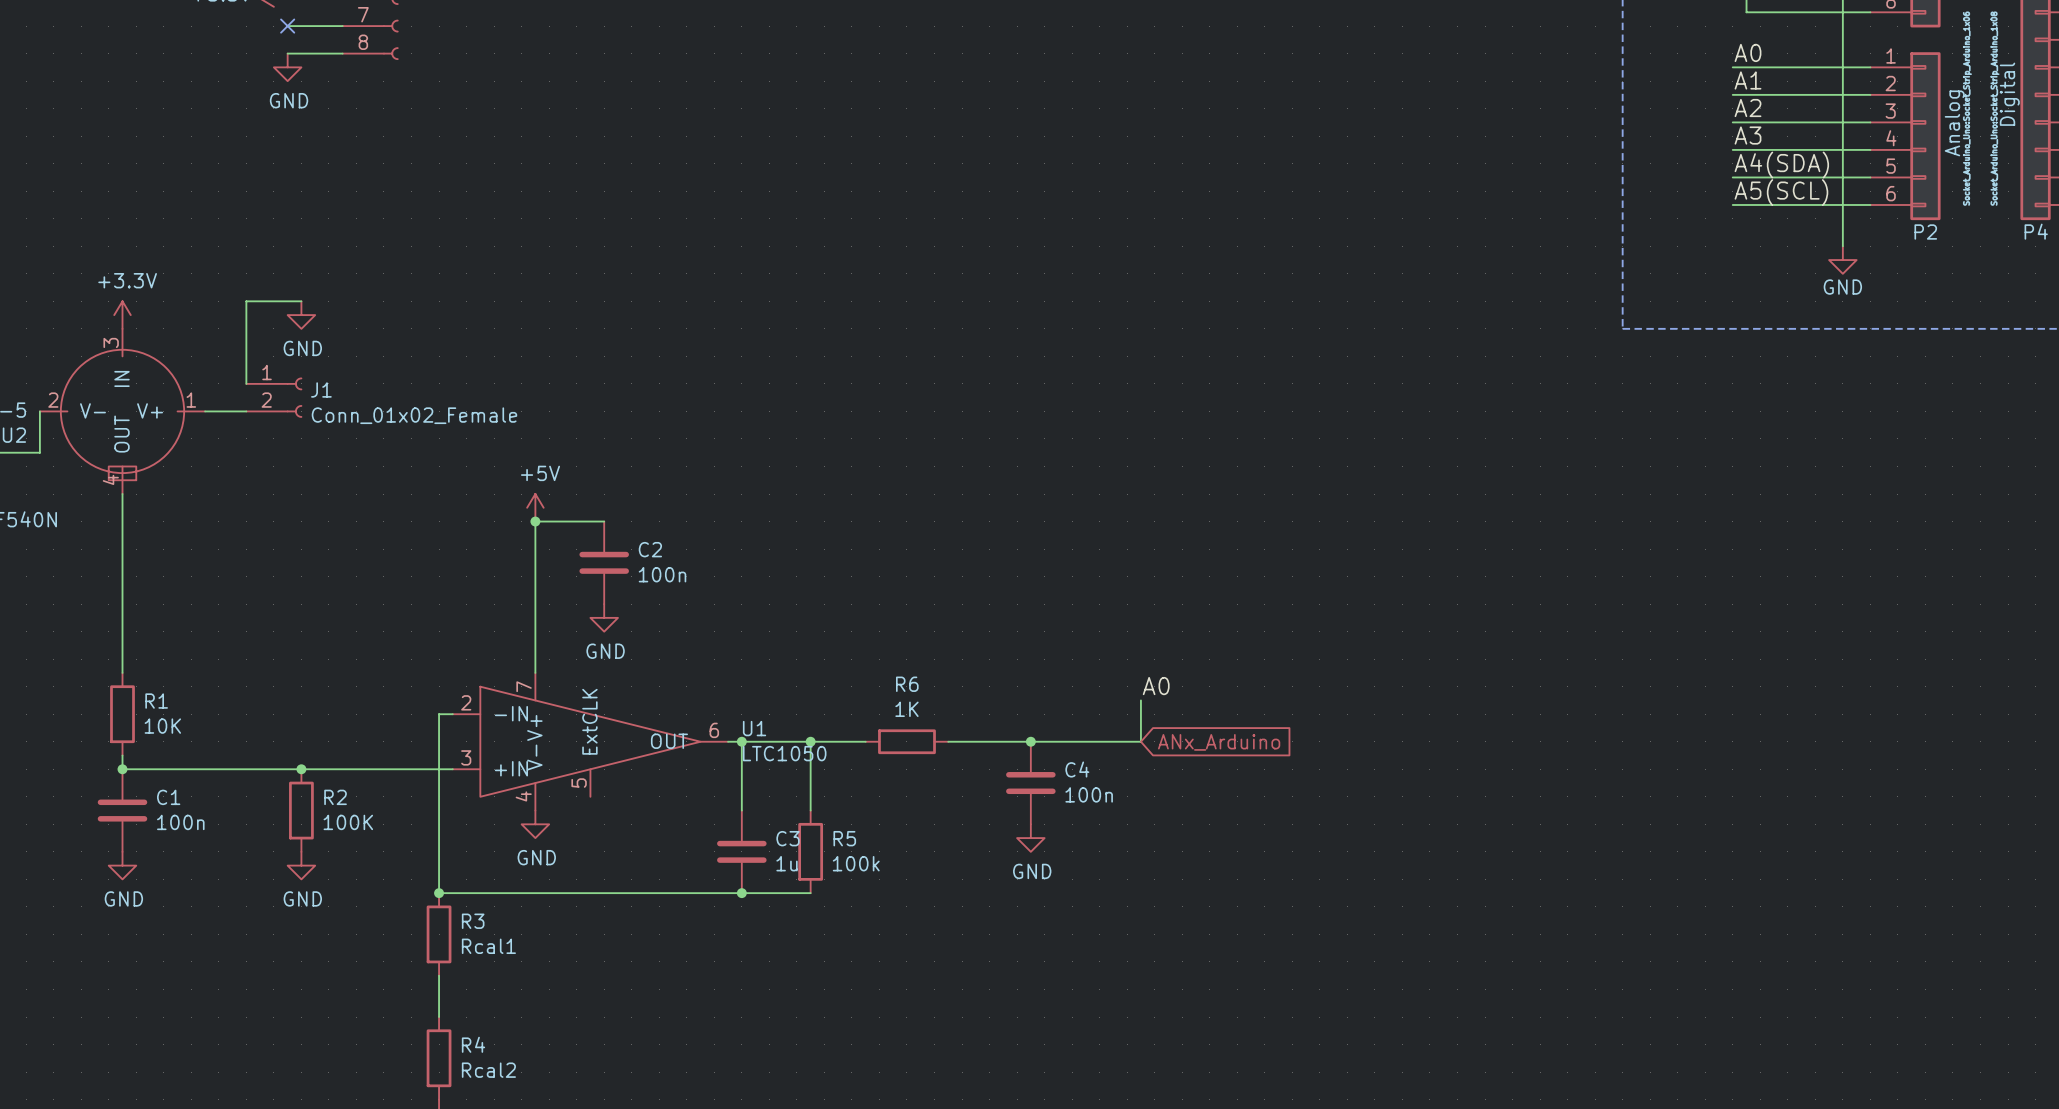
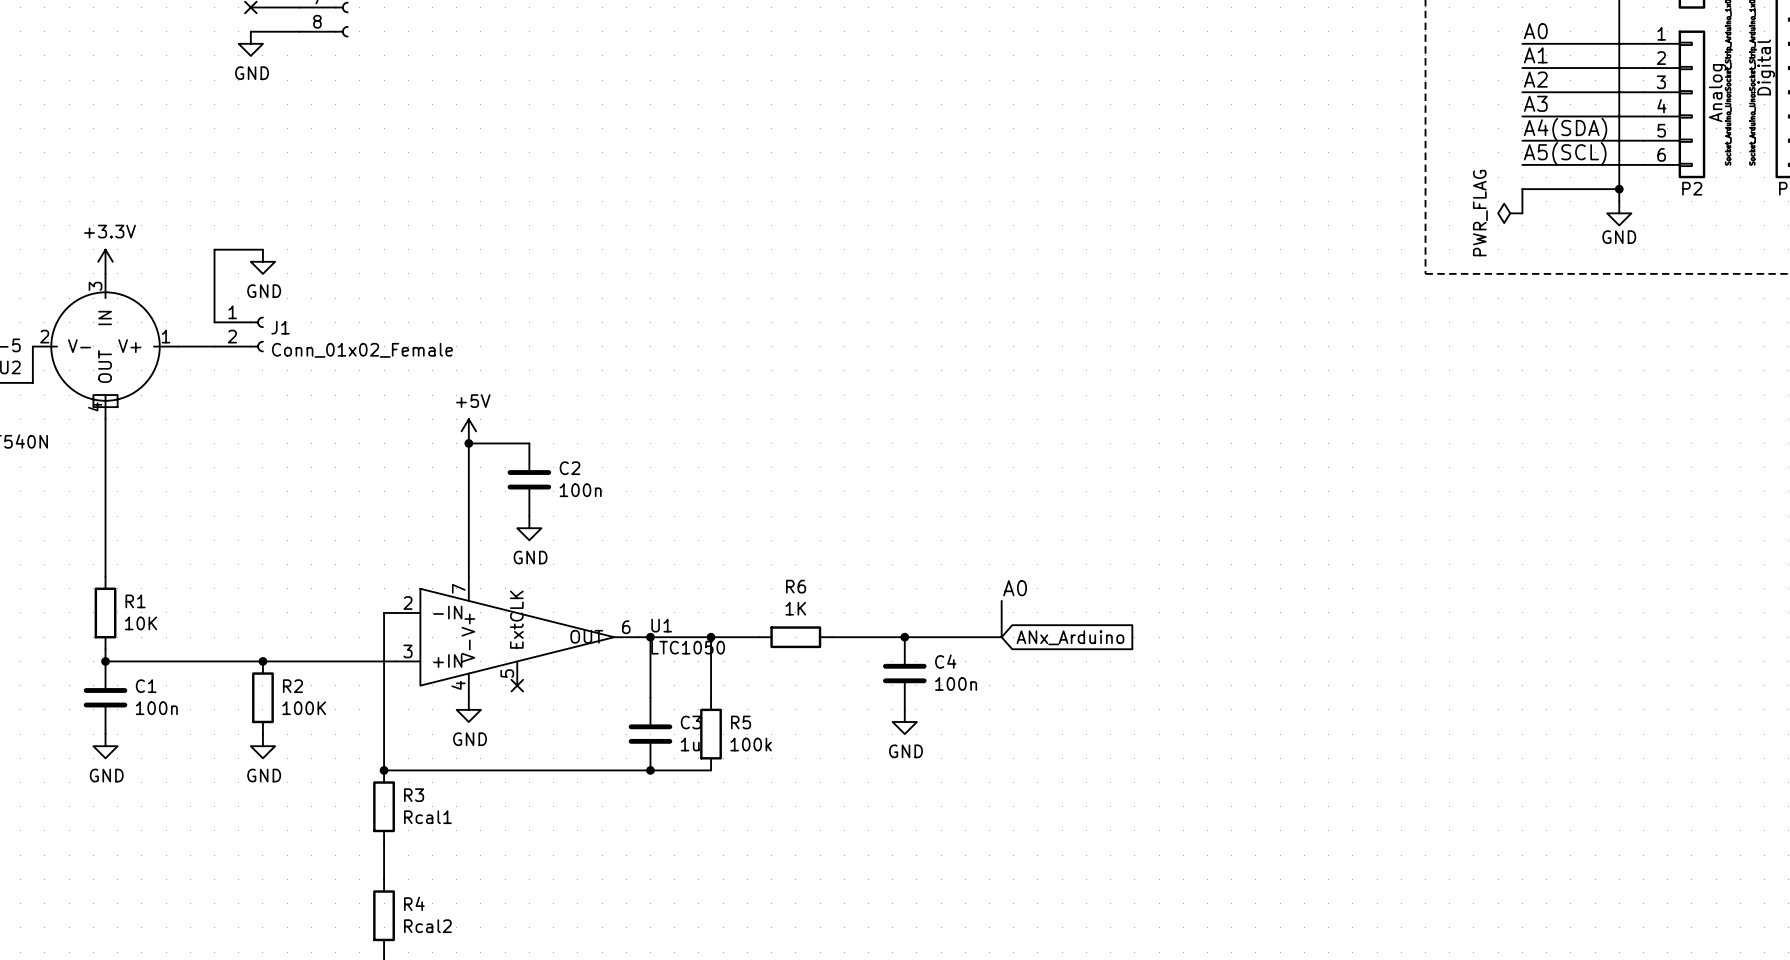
wire: none -> (1619, 189) (1522, 189) (1522, 213)
junction: none -> (1619, 189)
power symbol: none -> PWR_FLAG (1510, 213)
no-connect mark: none -> (517, 685)

